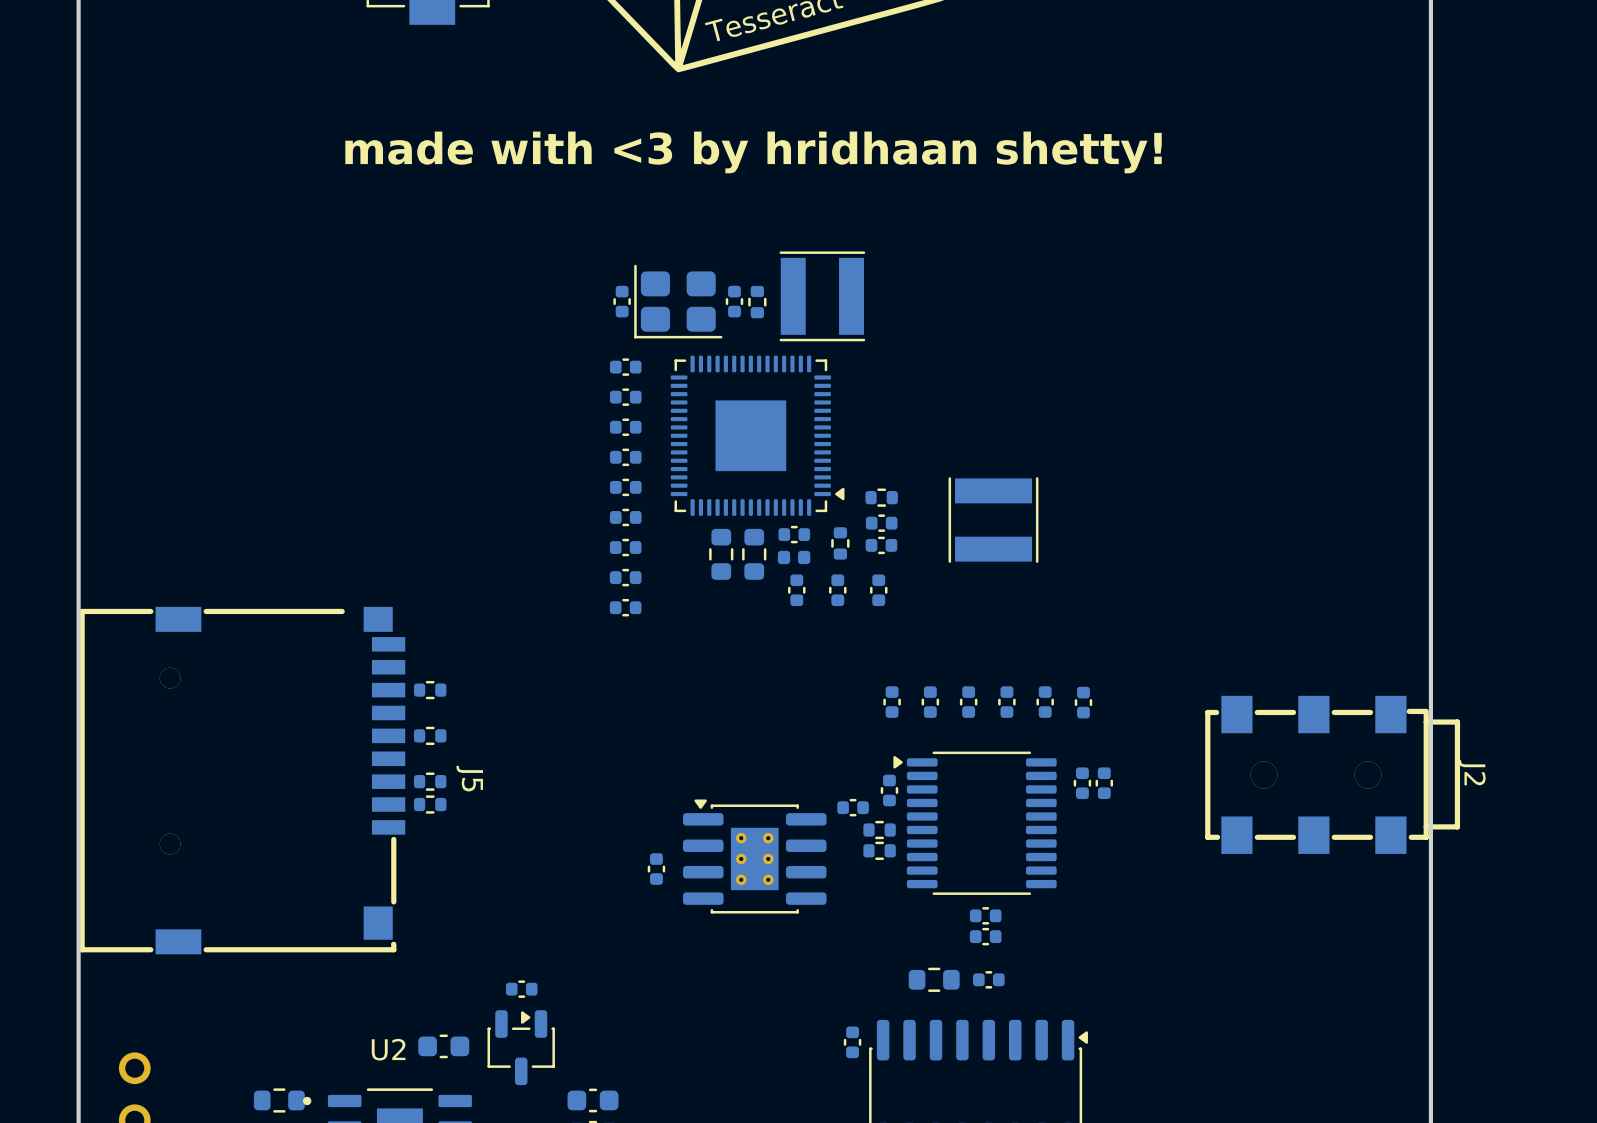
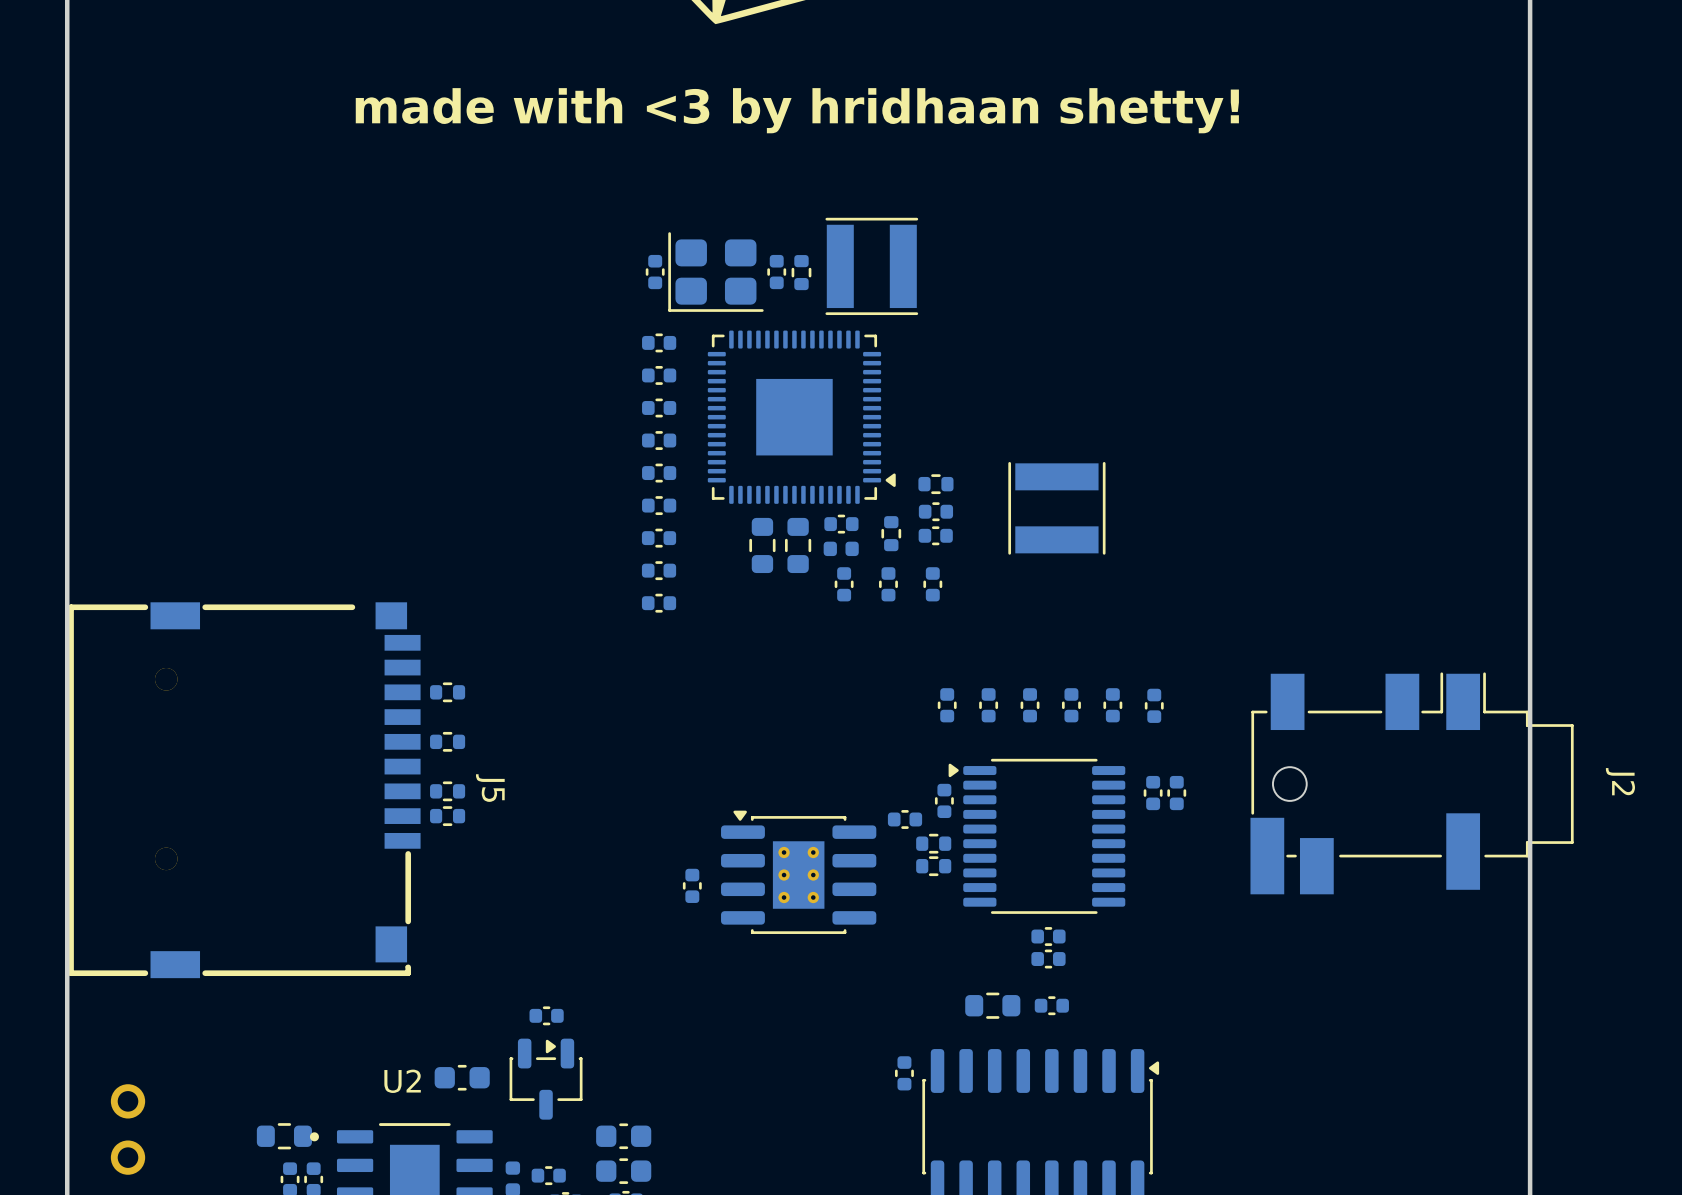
J2 footprint: [1205, 695, 1461, 854] -> [1250, 672, 1574, 895]
J2 name position: J2 (1472, 772) -> J2 (1620, 781)

